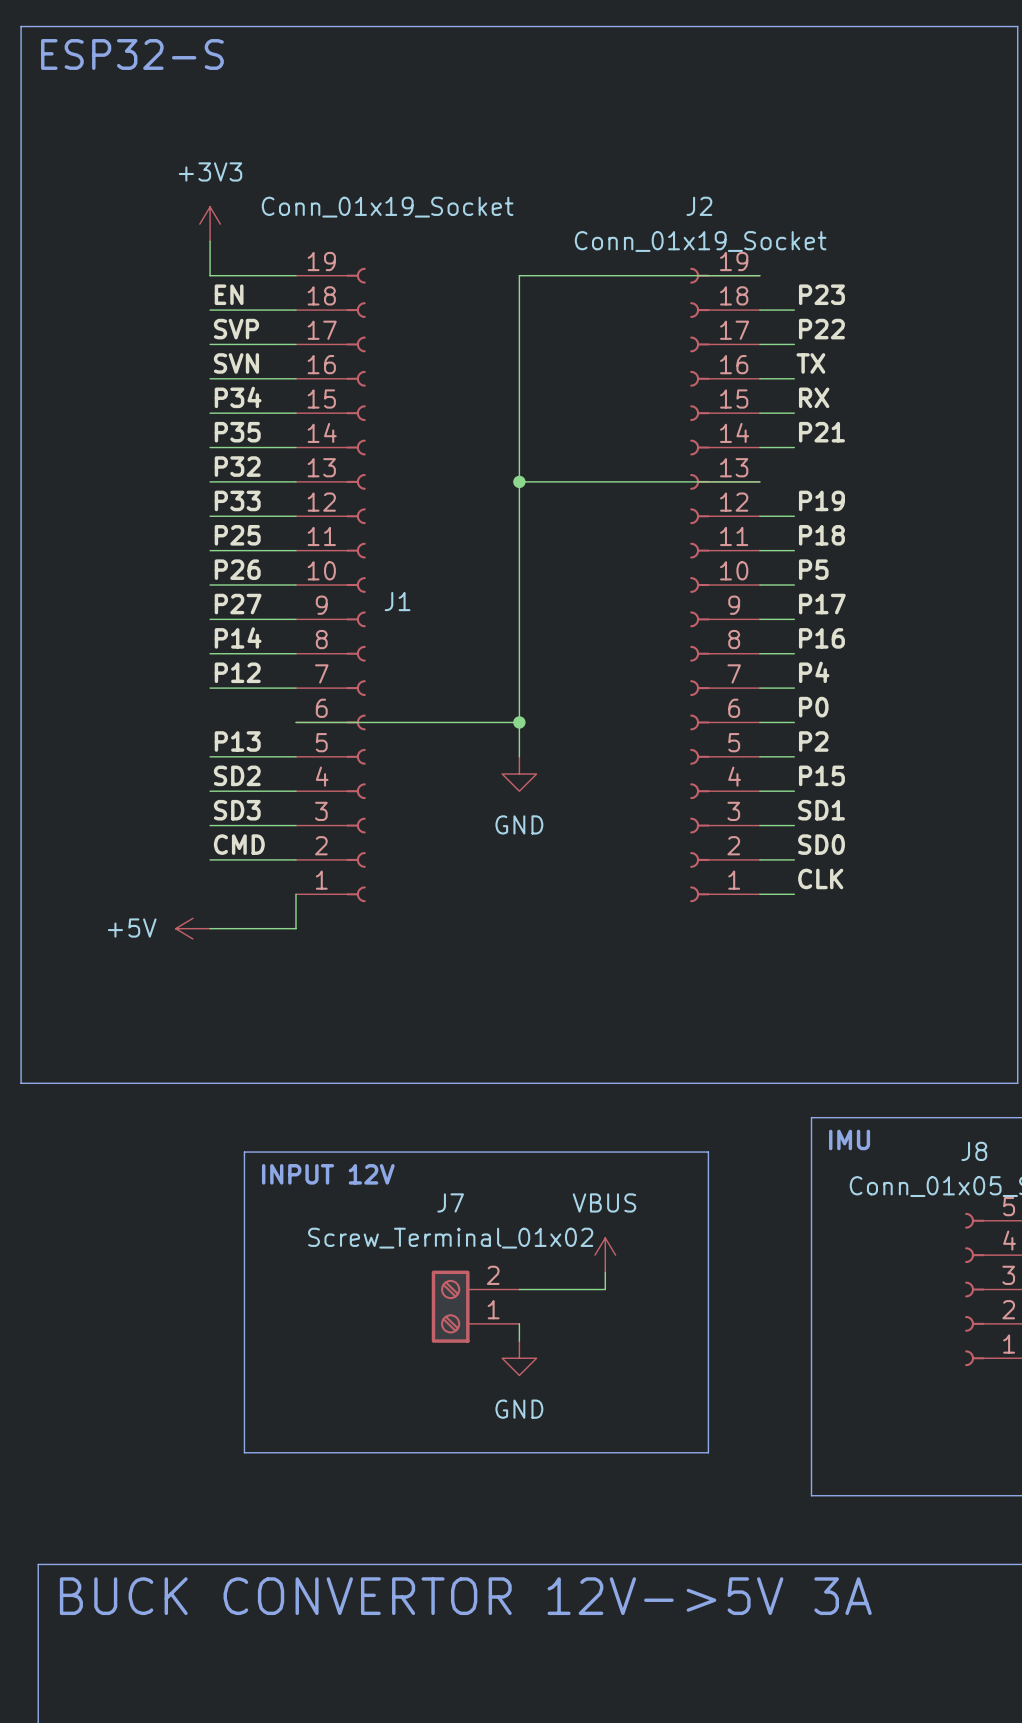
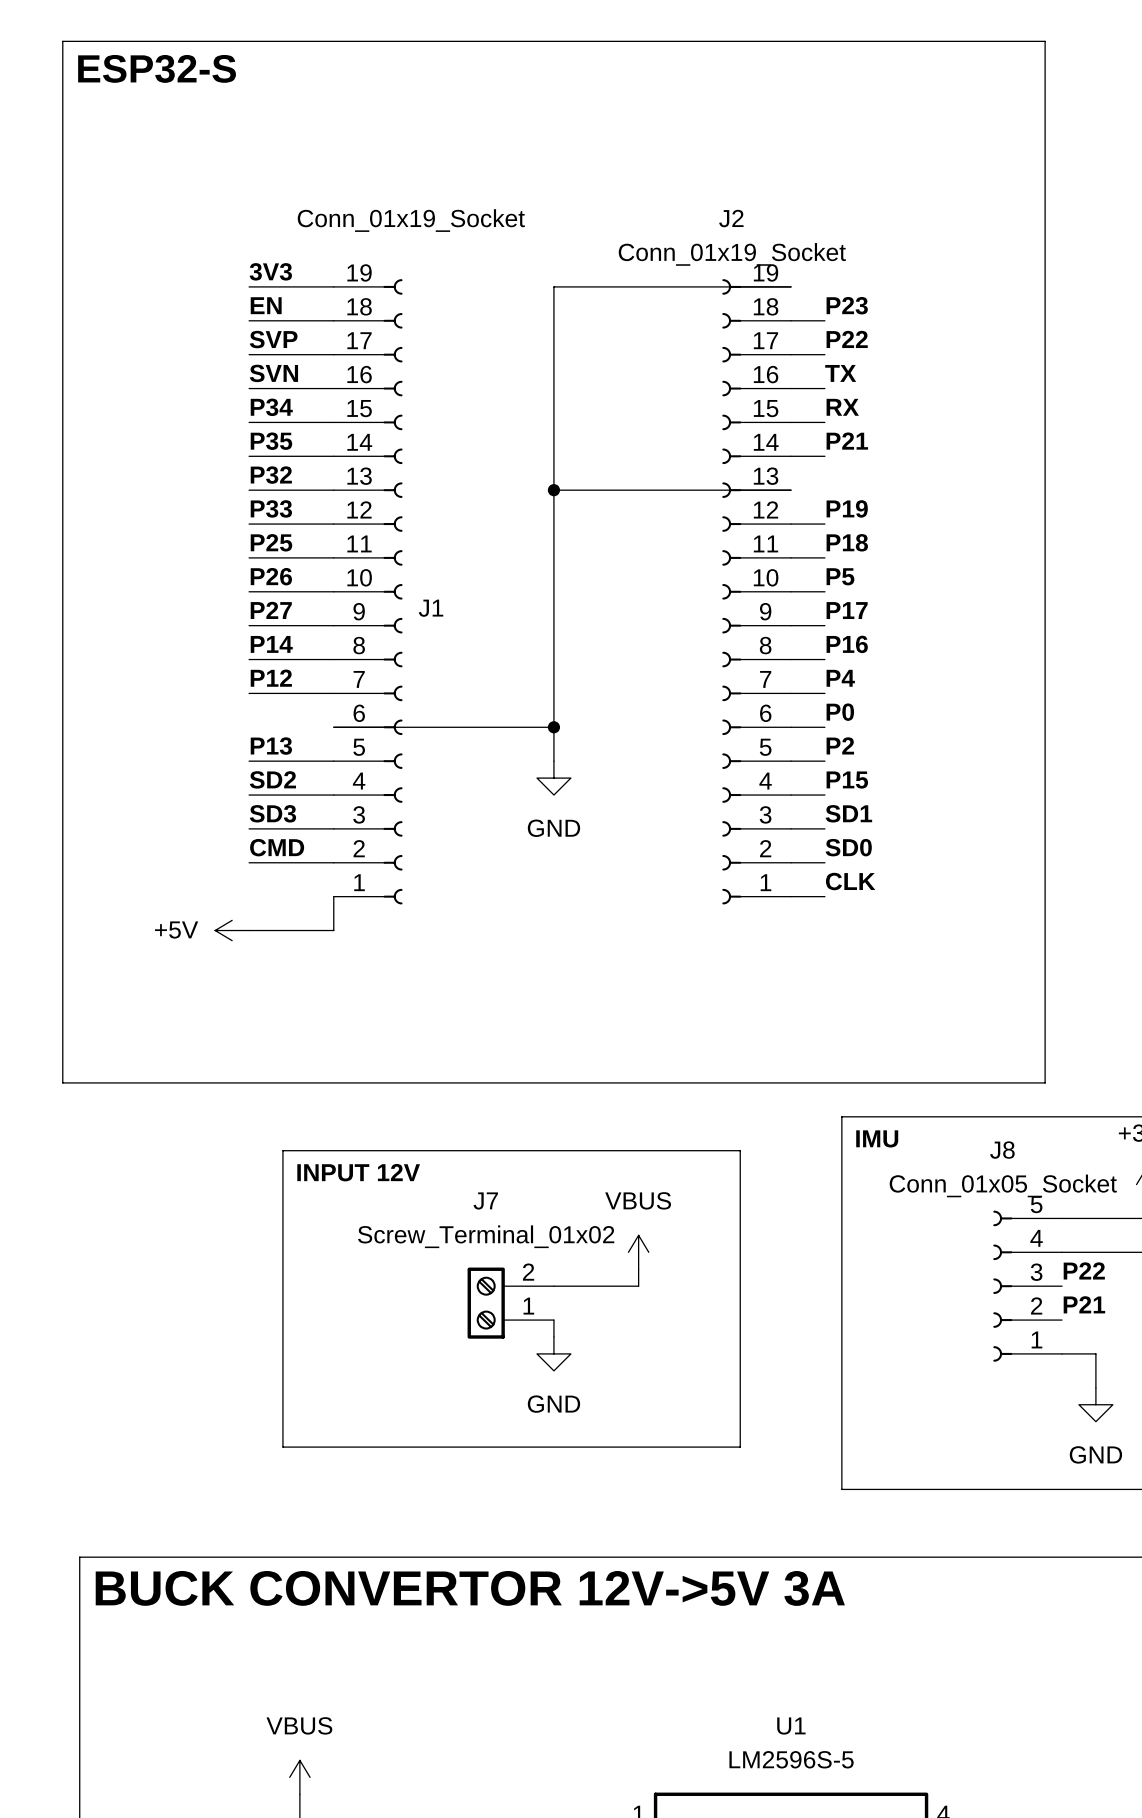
power symbol: +3V3 (210, 224) -> none
wire: (210, 241) (210, 275) -> none
label: none -> 3V3 (270, 271)

